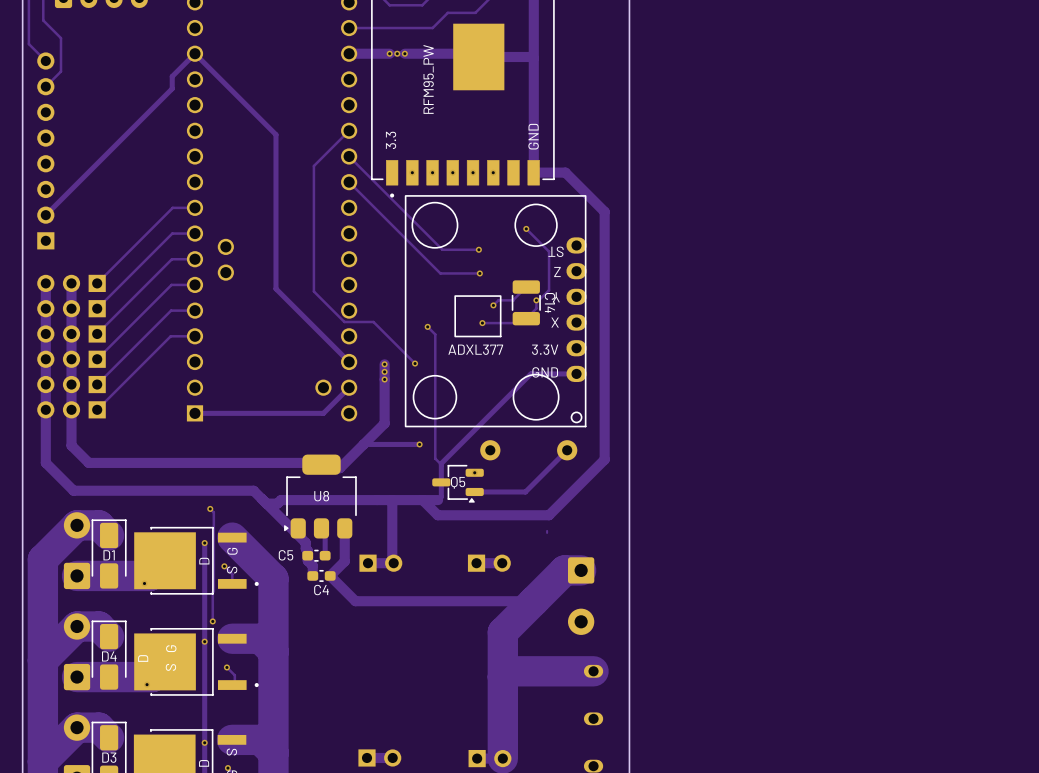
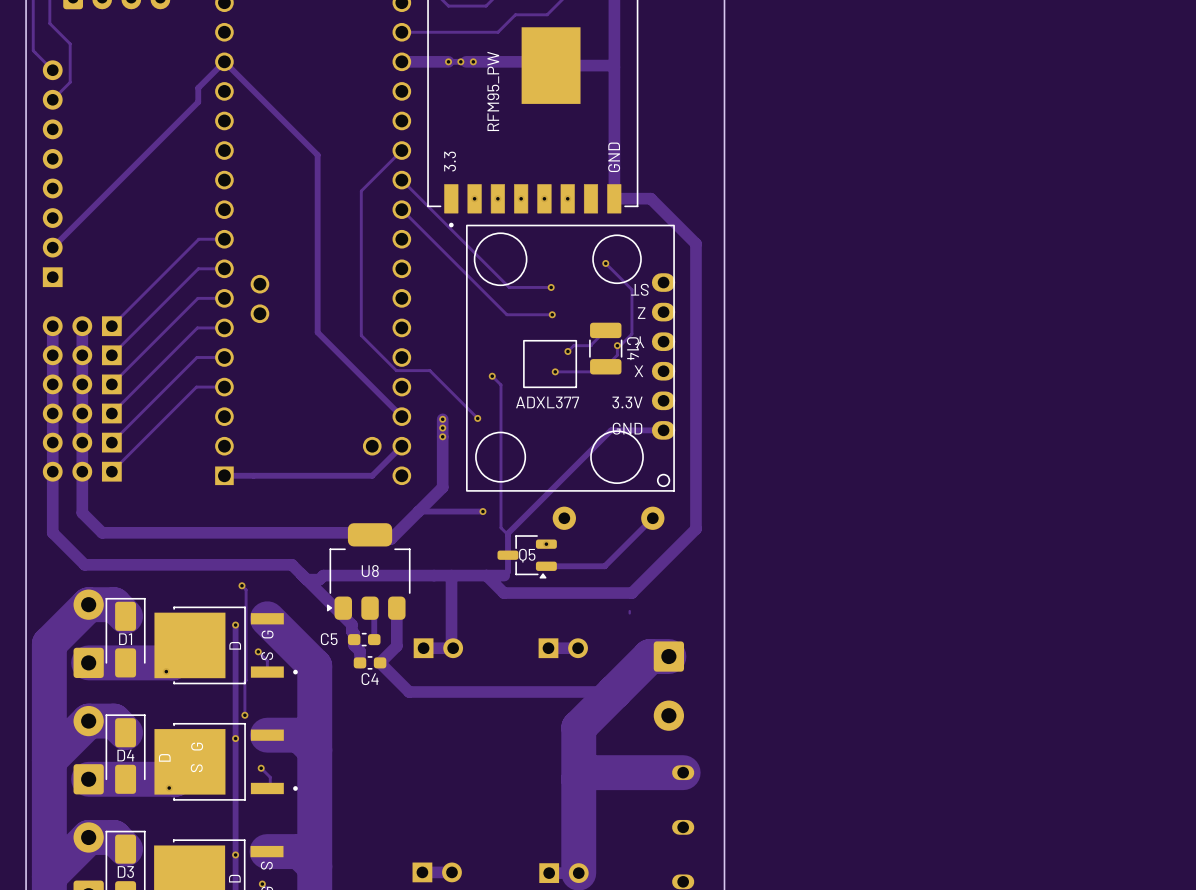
via: (397, 53) -> none
via: none -> (460, 61)
via: (404, 53) -> none
via: none -> (473, 61)

